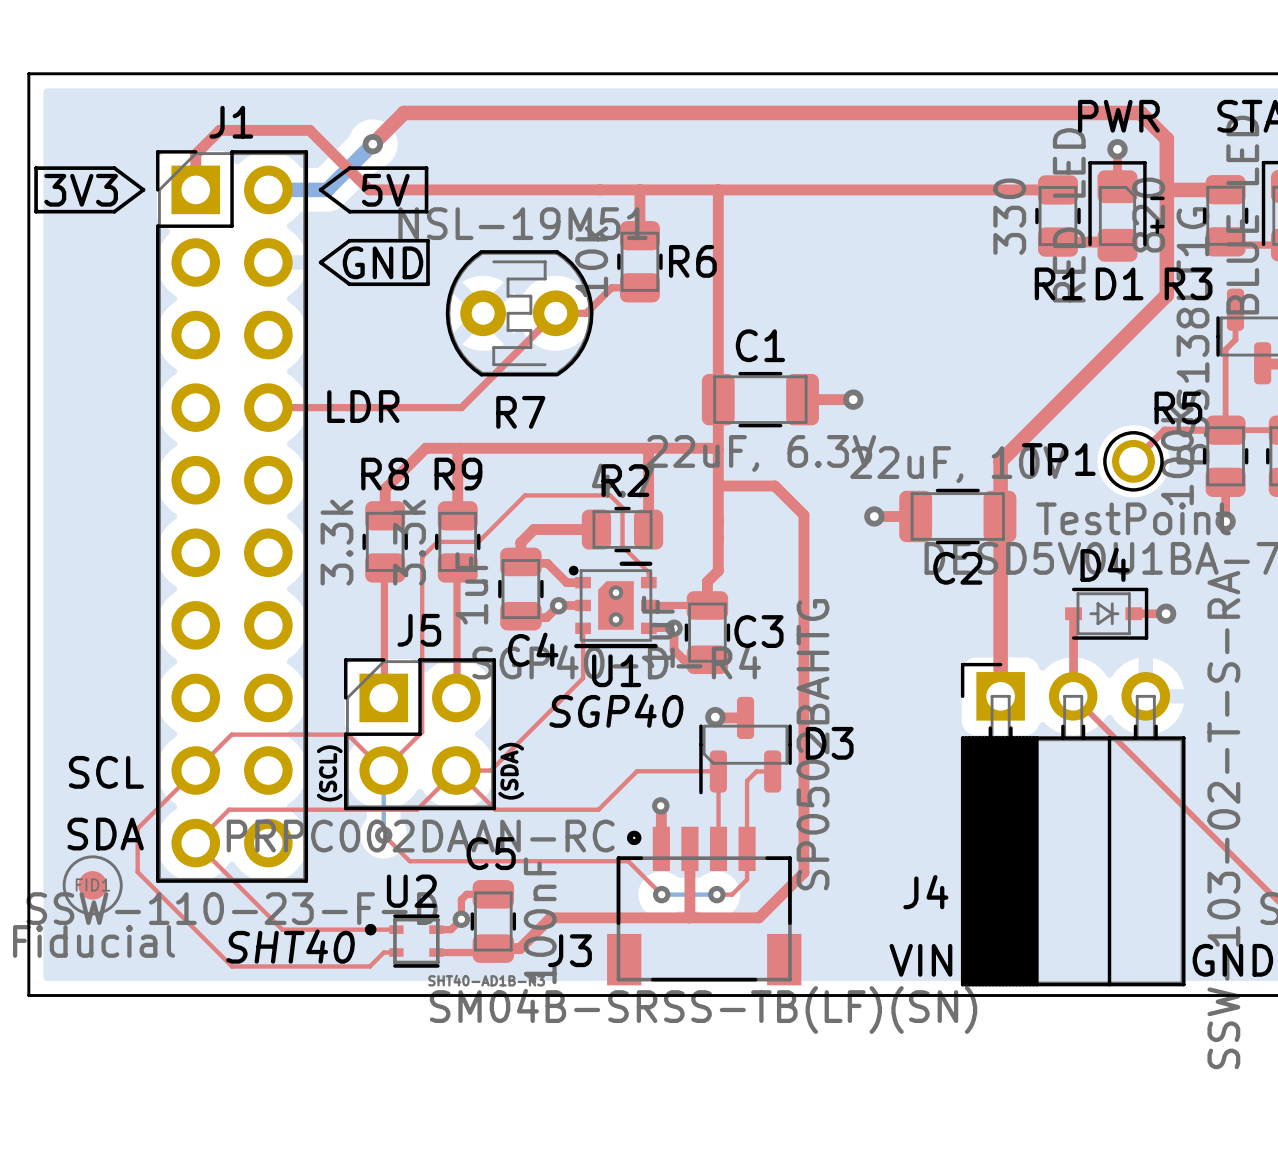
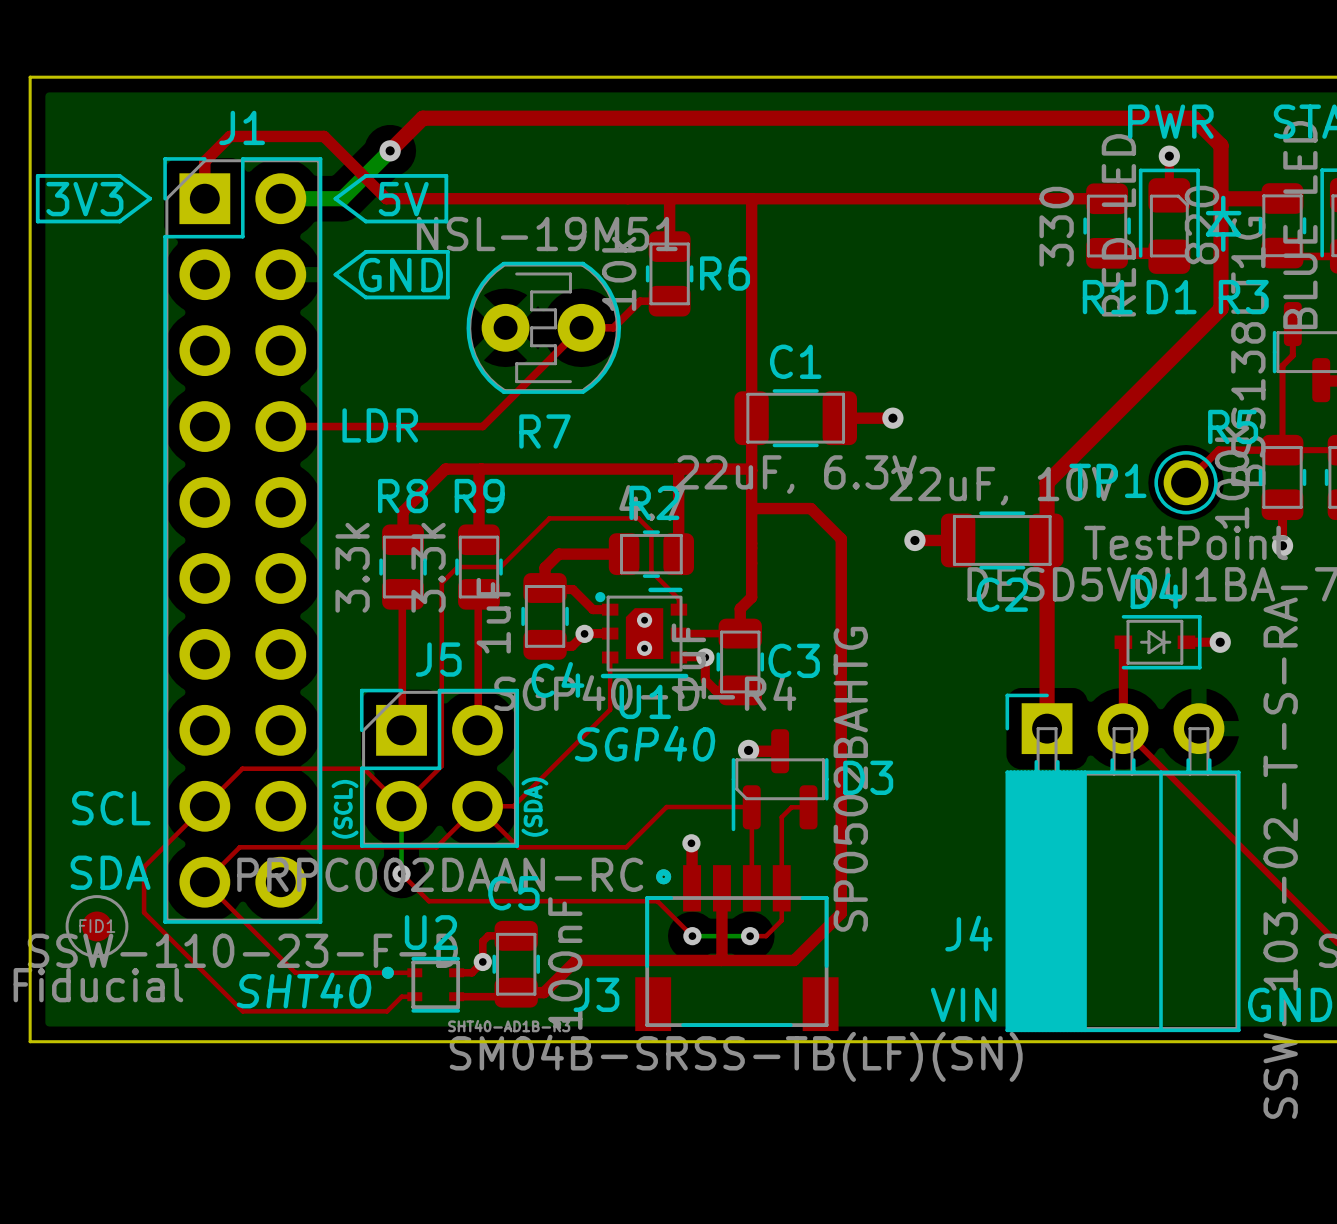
line: none -> (1223, 197) (1223, 213)
text: - (1157, 198) -> none
line: none -> (1208, 213) (1239, 213)
line: none -> (1223, 213) (1208, 234) (1238, 234) (1223, 213)
line: none -> (1223, 234) (1223, 249)
text: + (1157, 226) -> none

